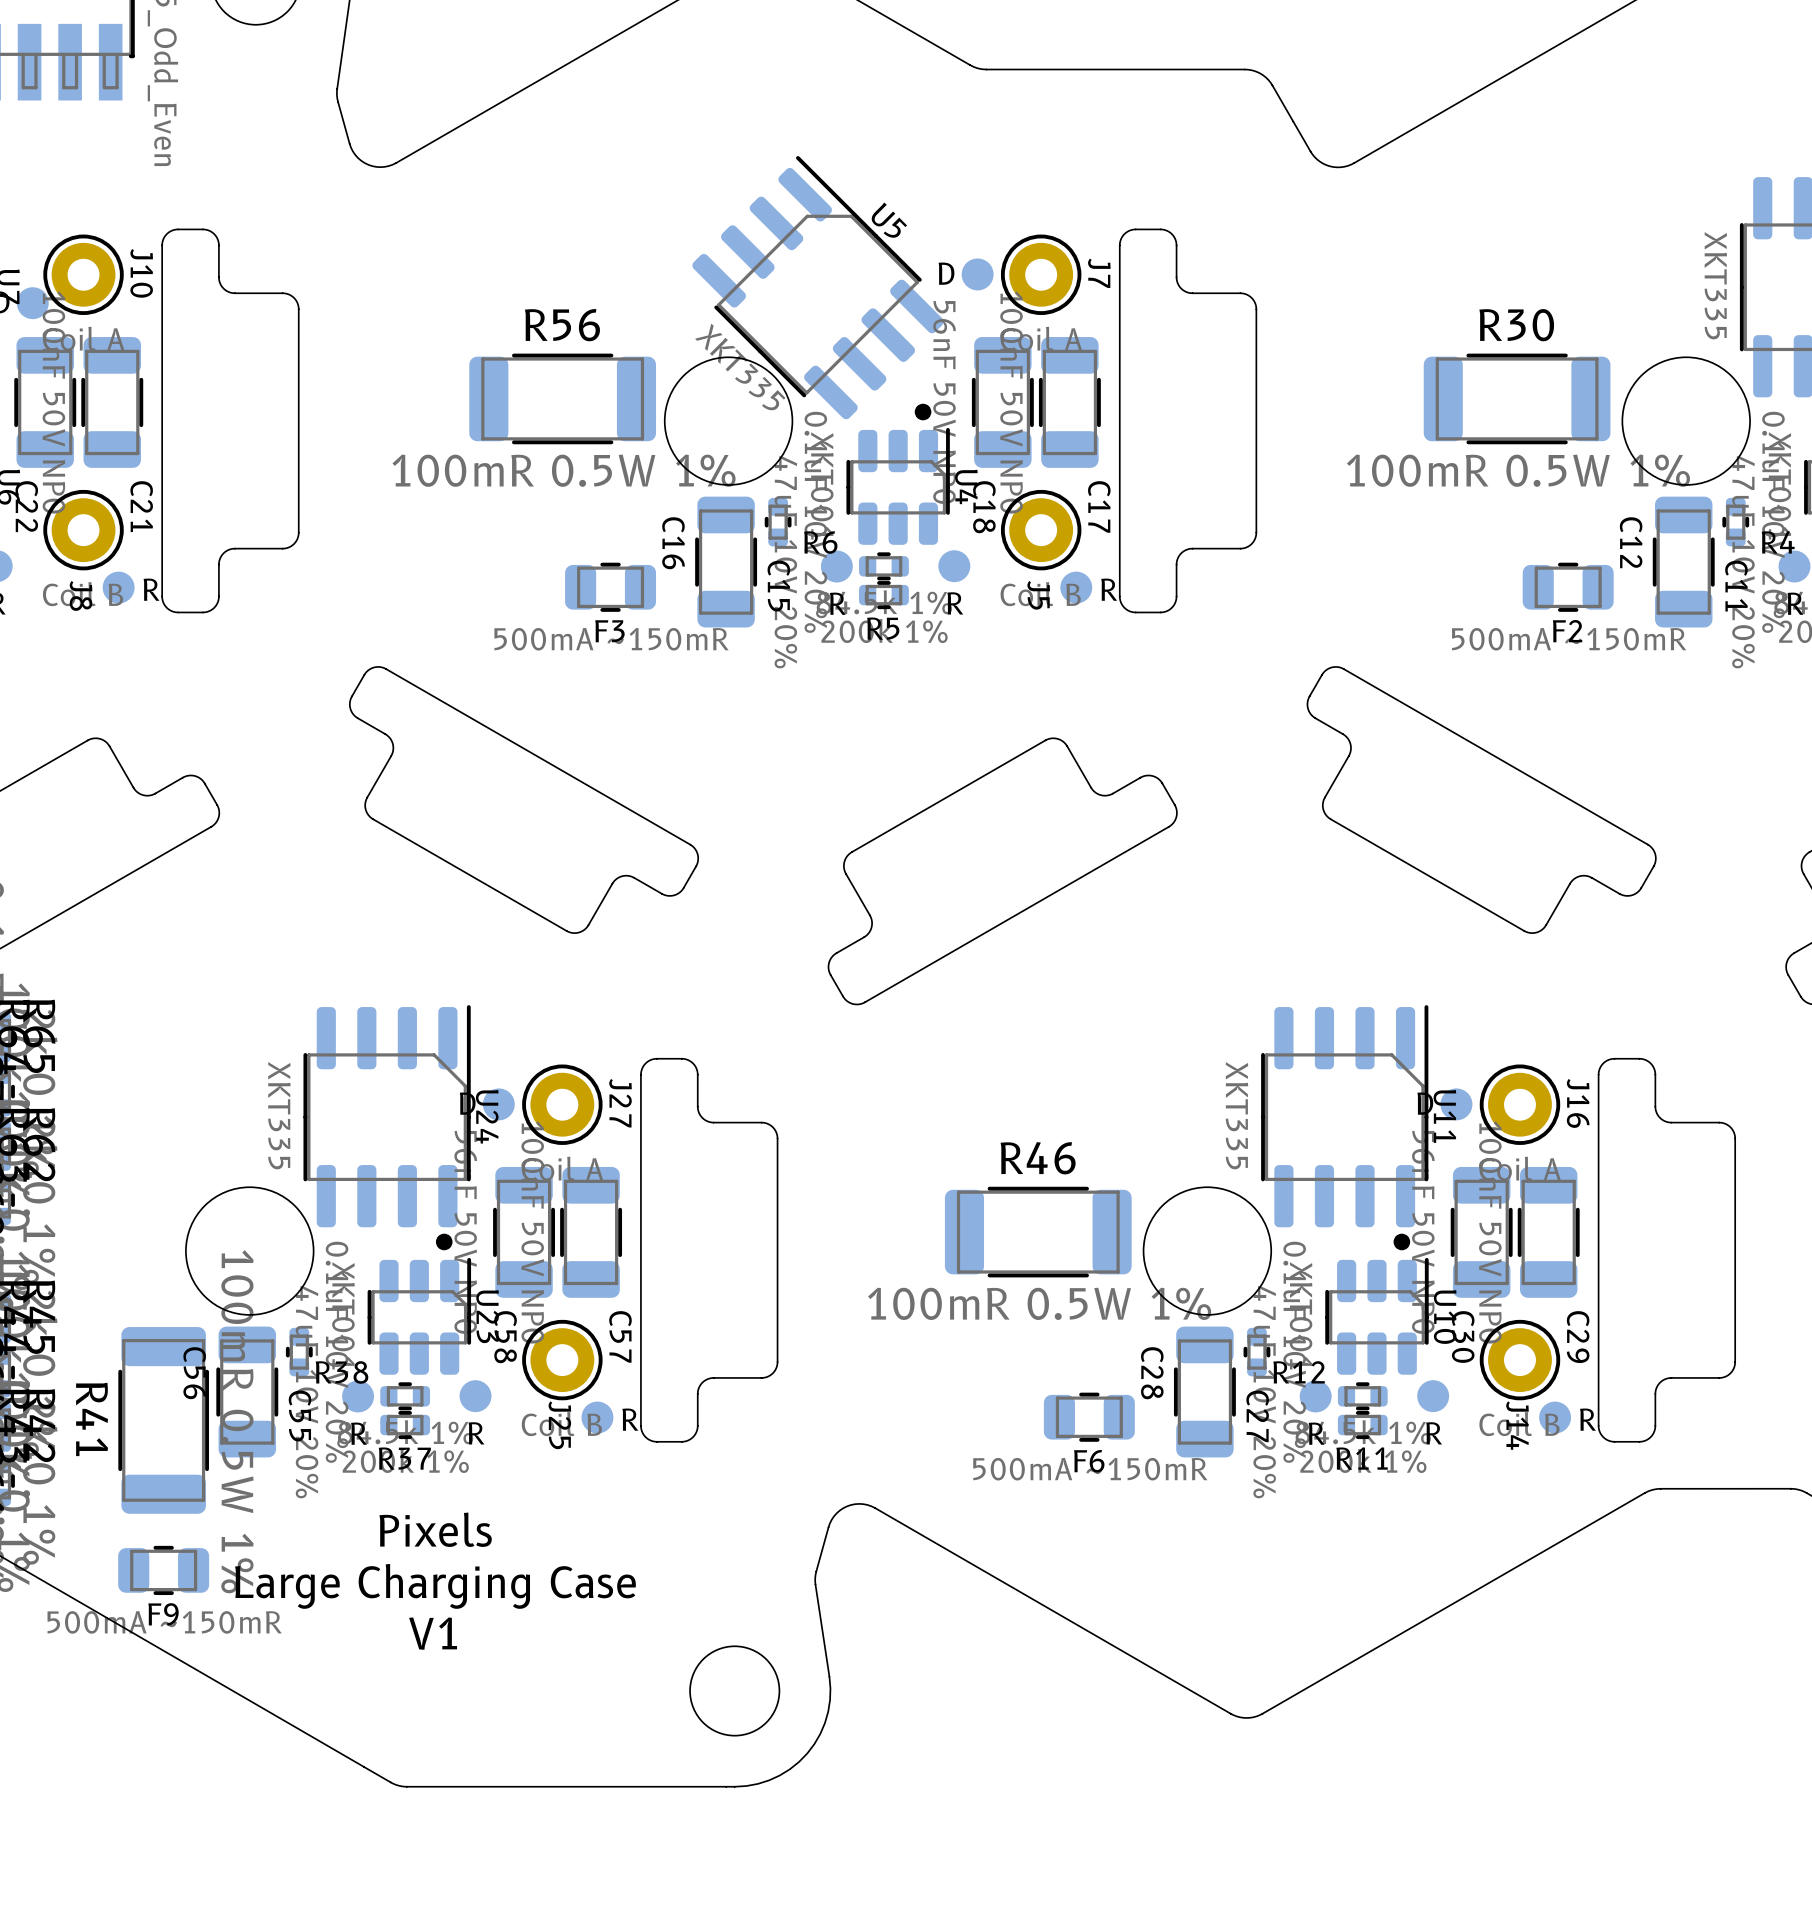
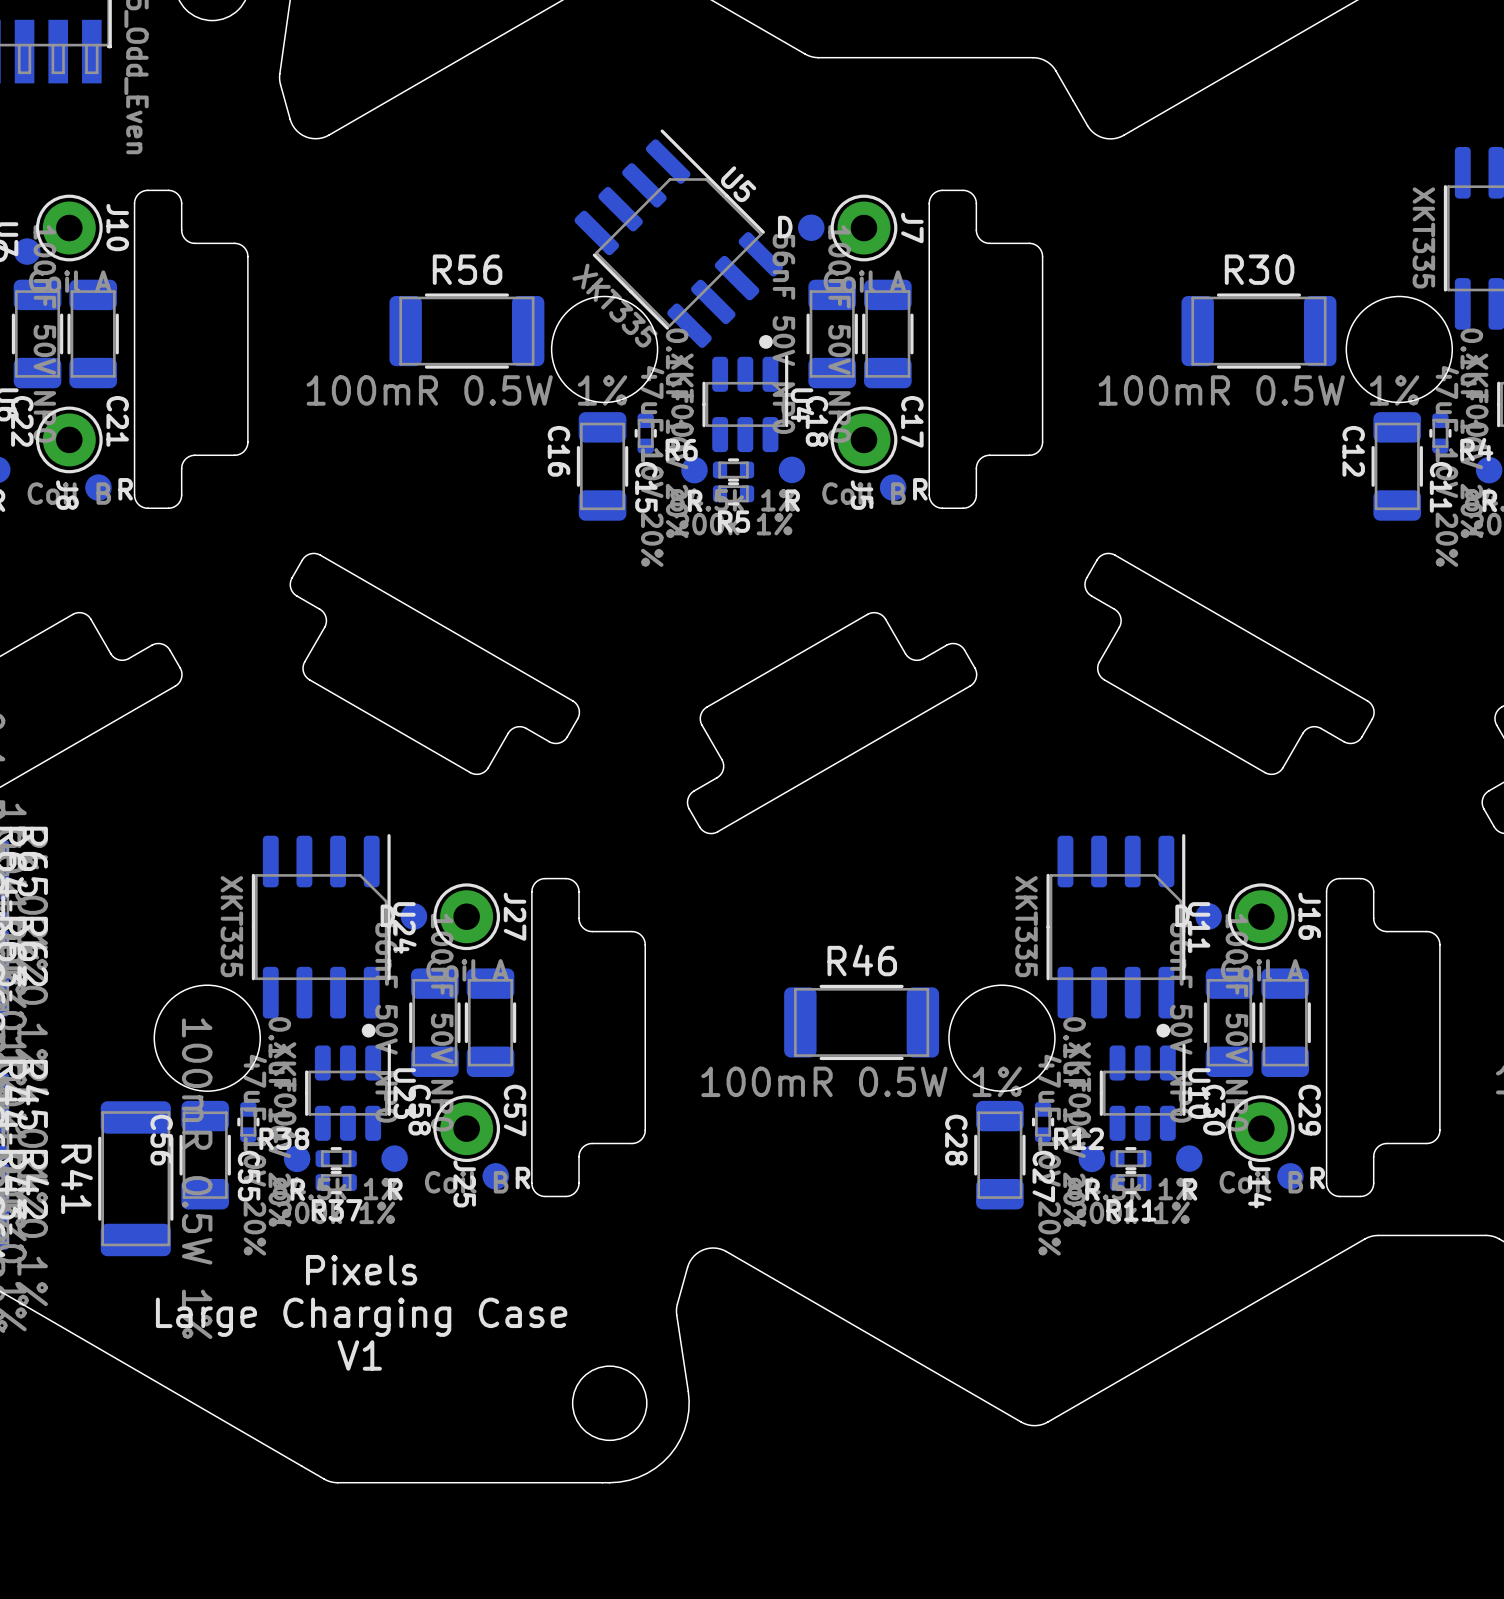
F3: 500mA ~150mR (610, 587) -> none
F2: 500mA ~150mR (1568, 587) -> none
F6: 500mA ~150mR (1089, 1417) -> none
F9: 500mA ~150mR (163, 1570) -> none

